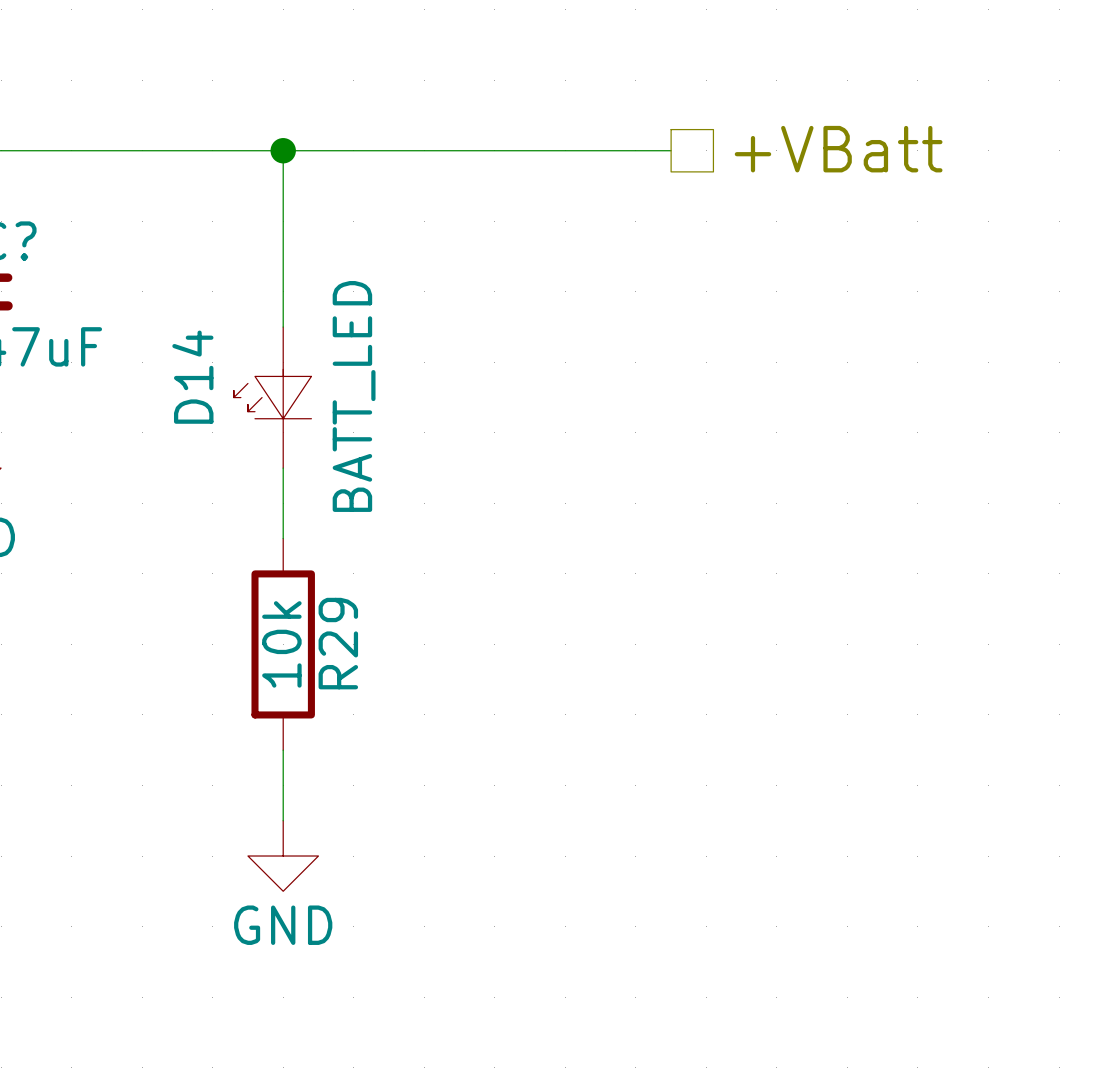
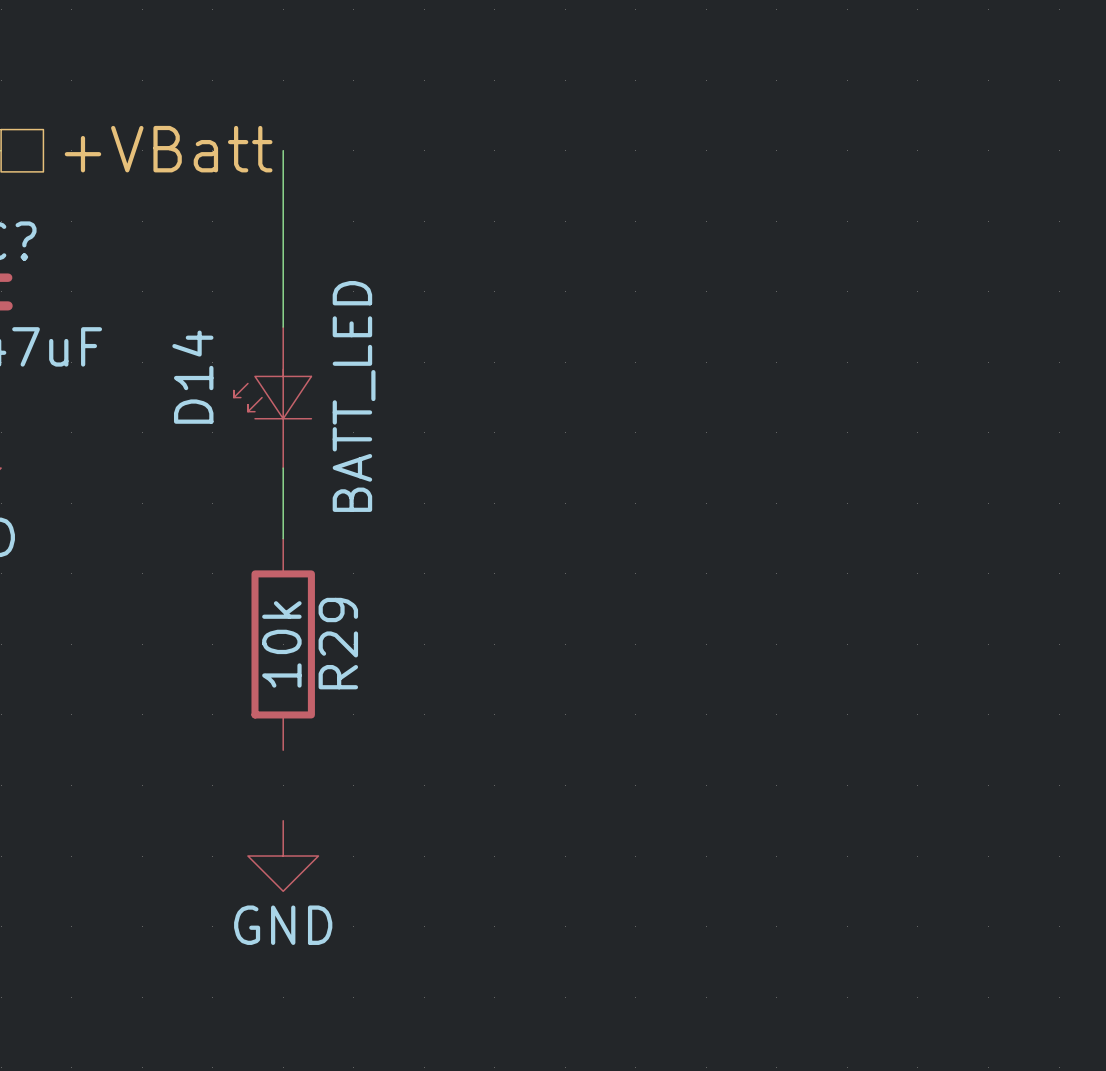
hierarchical label position: +VBatt (838, 149) -> +VBatt (168, 149)
wire: (1, 150) (671, 150) -> none
junction: (283, 150) -> none
wire: (283, 750) (283, 820) -> none

